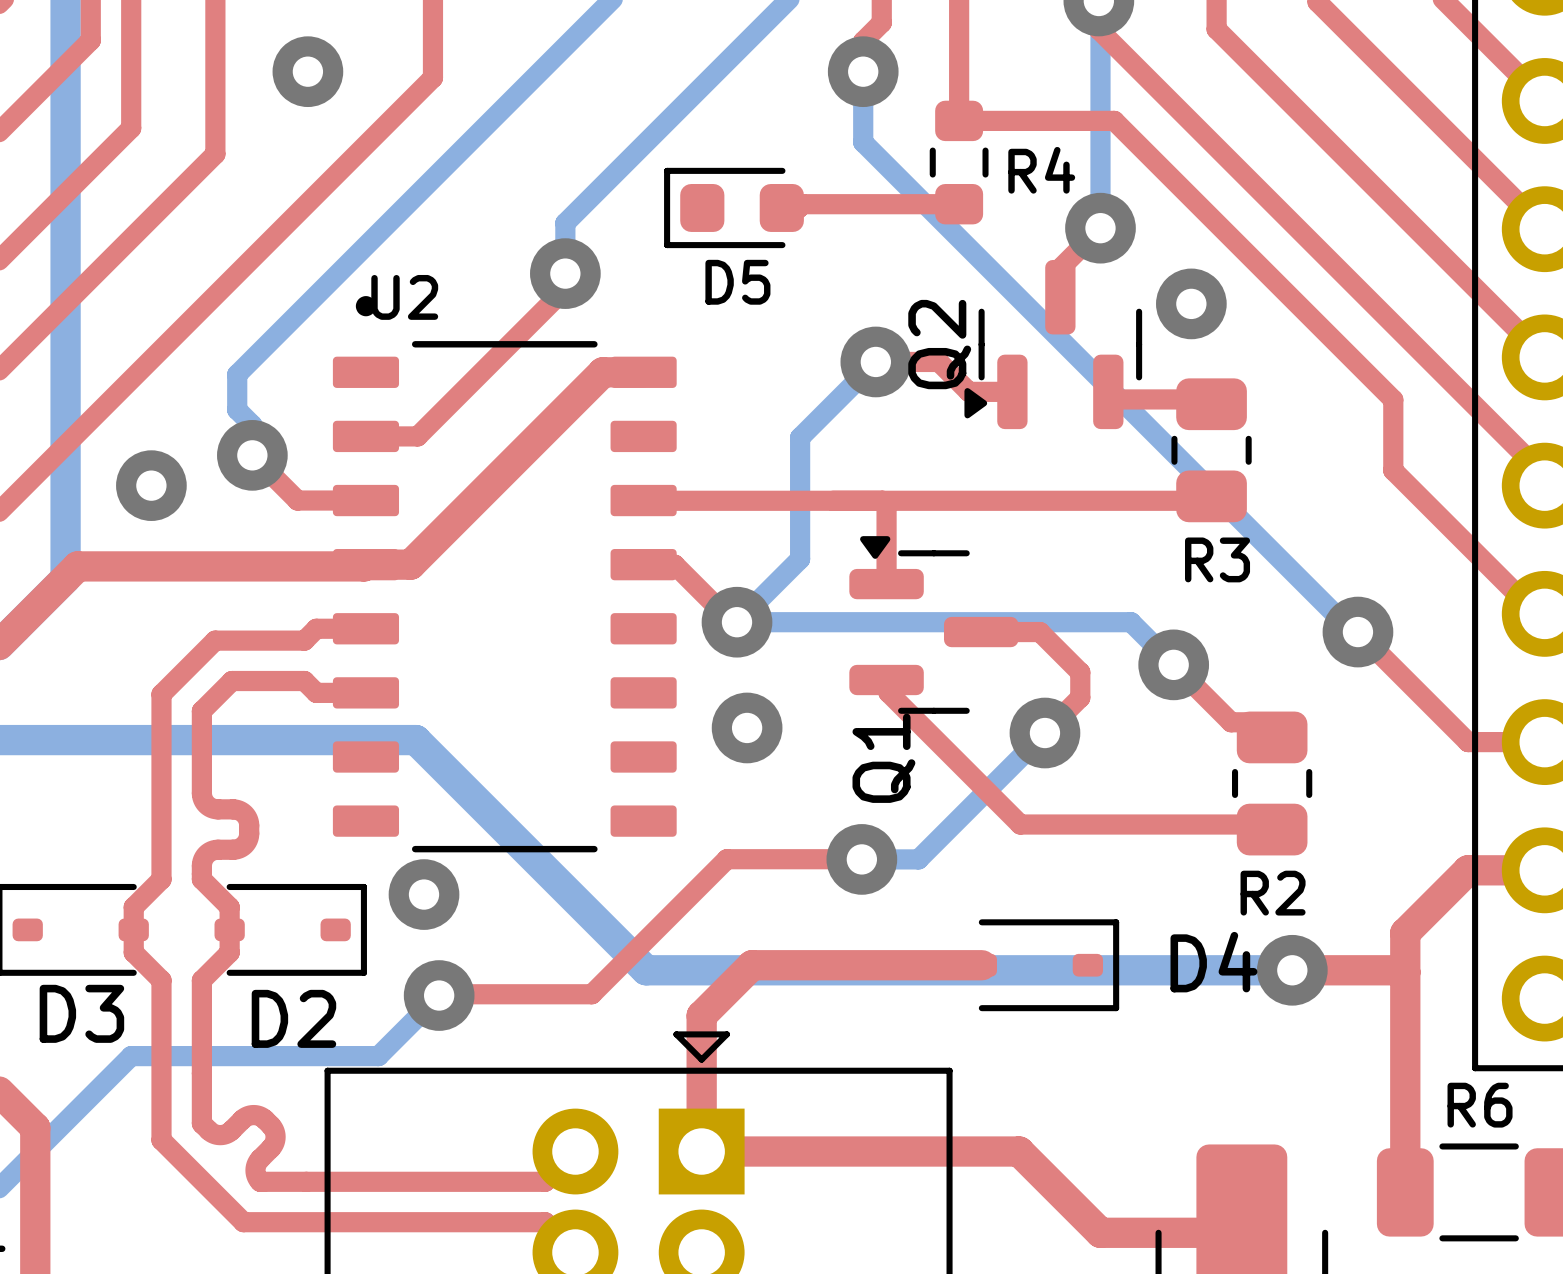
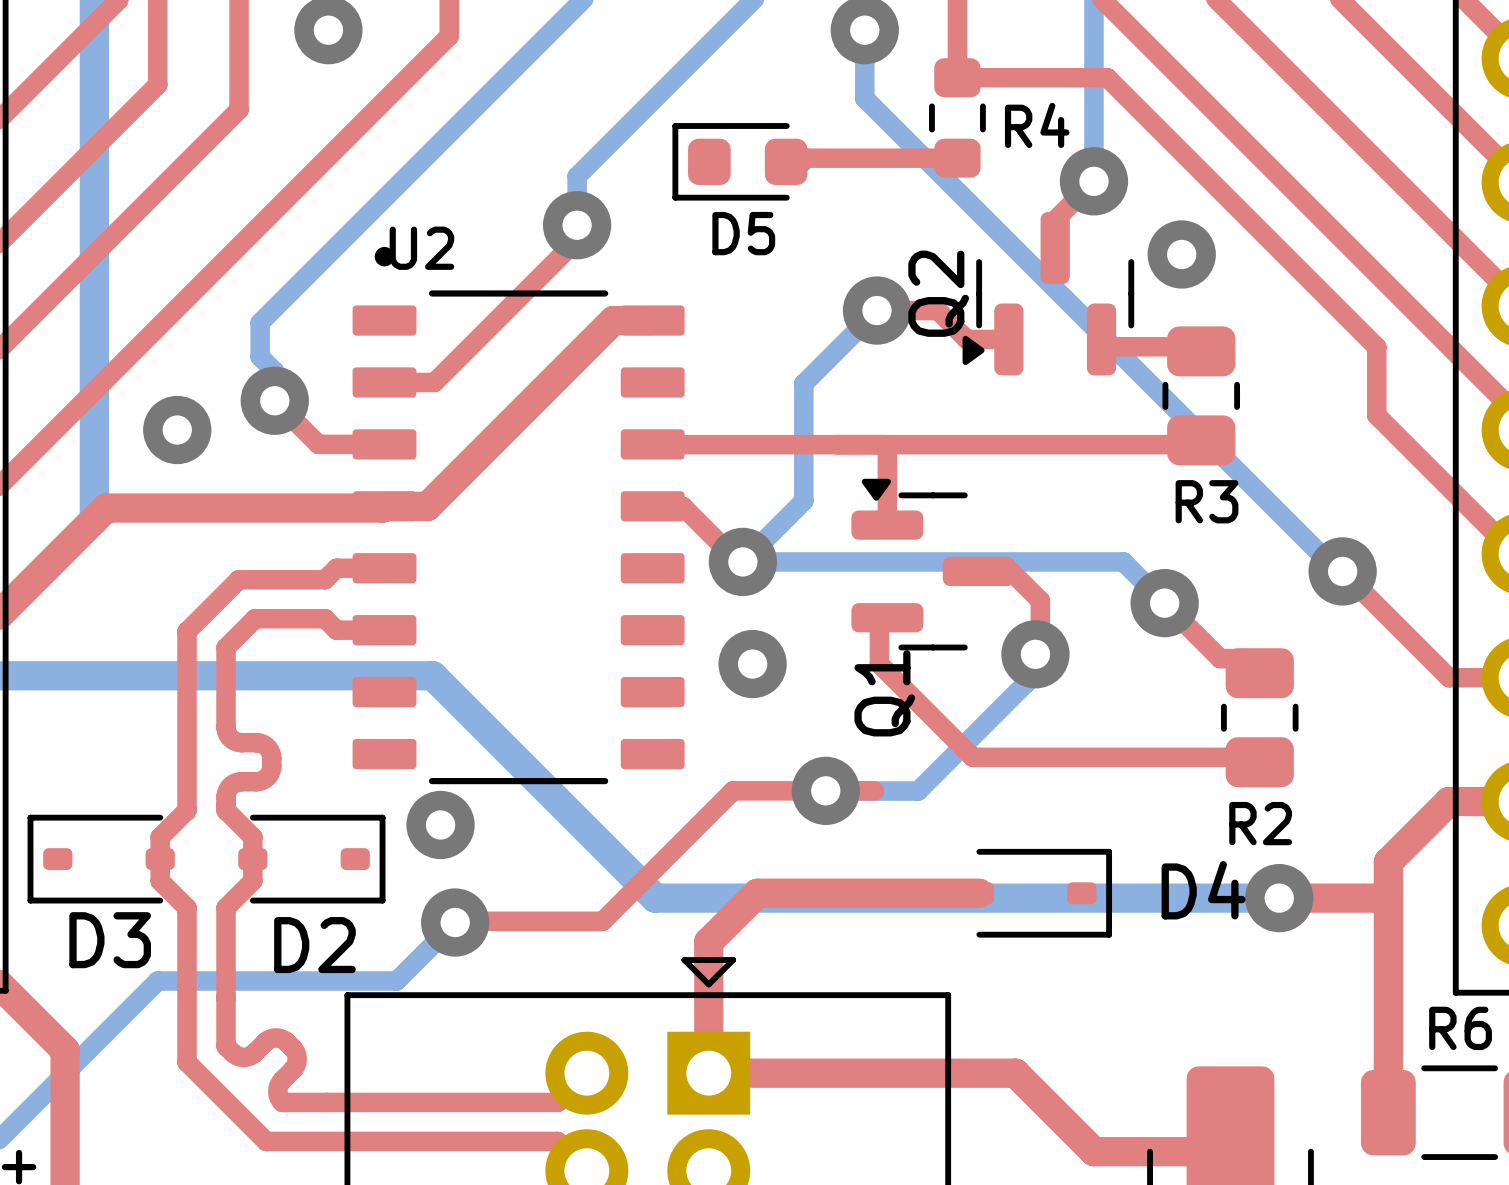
top track: (1014, 632) (1039, 632) (1080, 672) (1080, 697) (1044, 733) -> (1011, 571) (1040, 600) (1040, 634) (1035, 639) (1035, 654)
top track: (886, 680) (888, 681) (888, 692) (1020, 824) -> (887, 617) (879, 625) (879, 664) (972, 757) (1016, 757)
via position: (1044, 733) -> (1035, 654)
via position: (861, 859) -> (825, 790)

